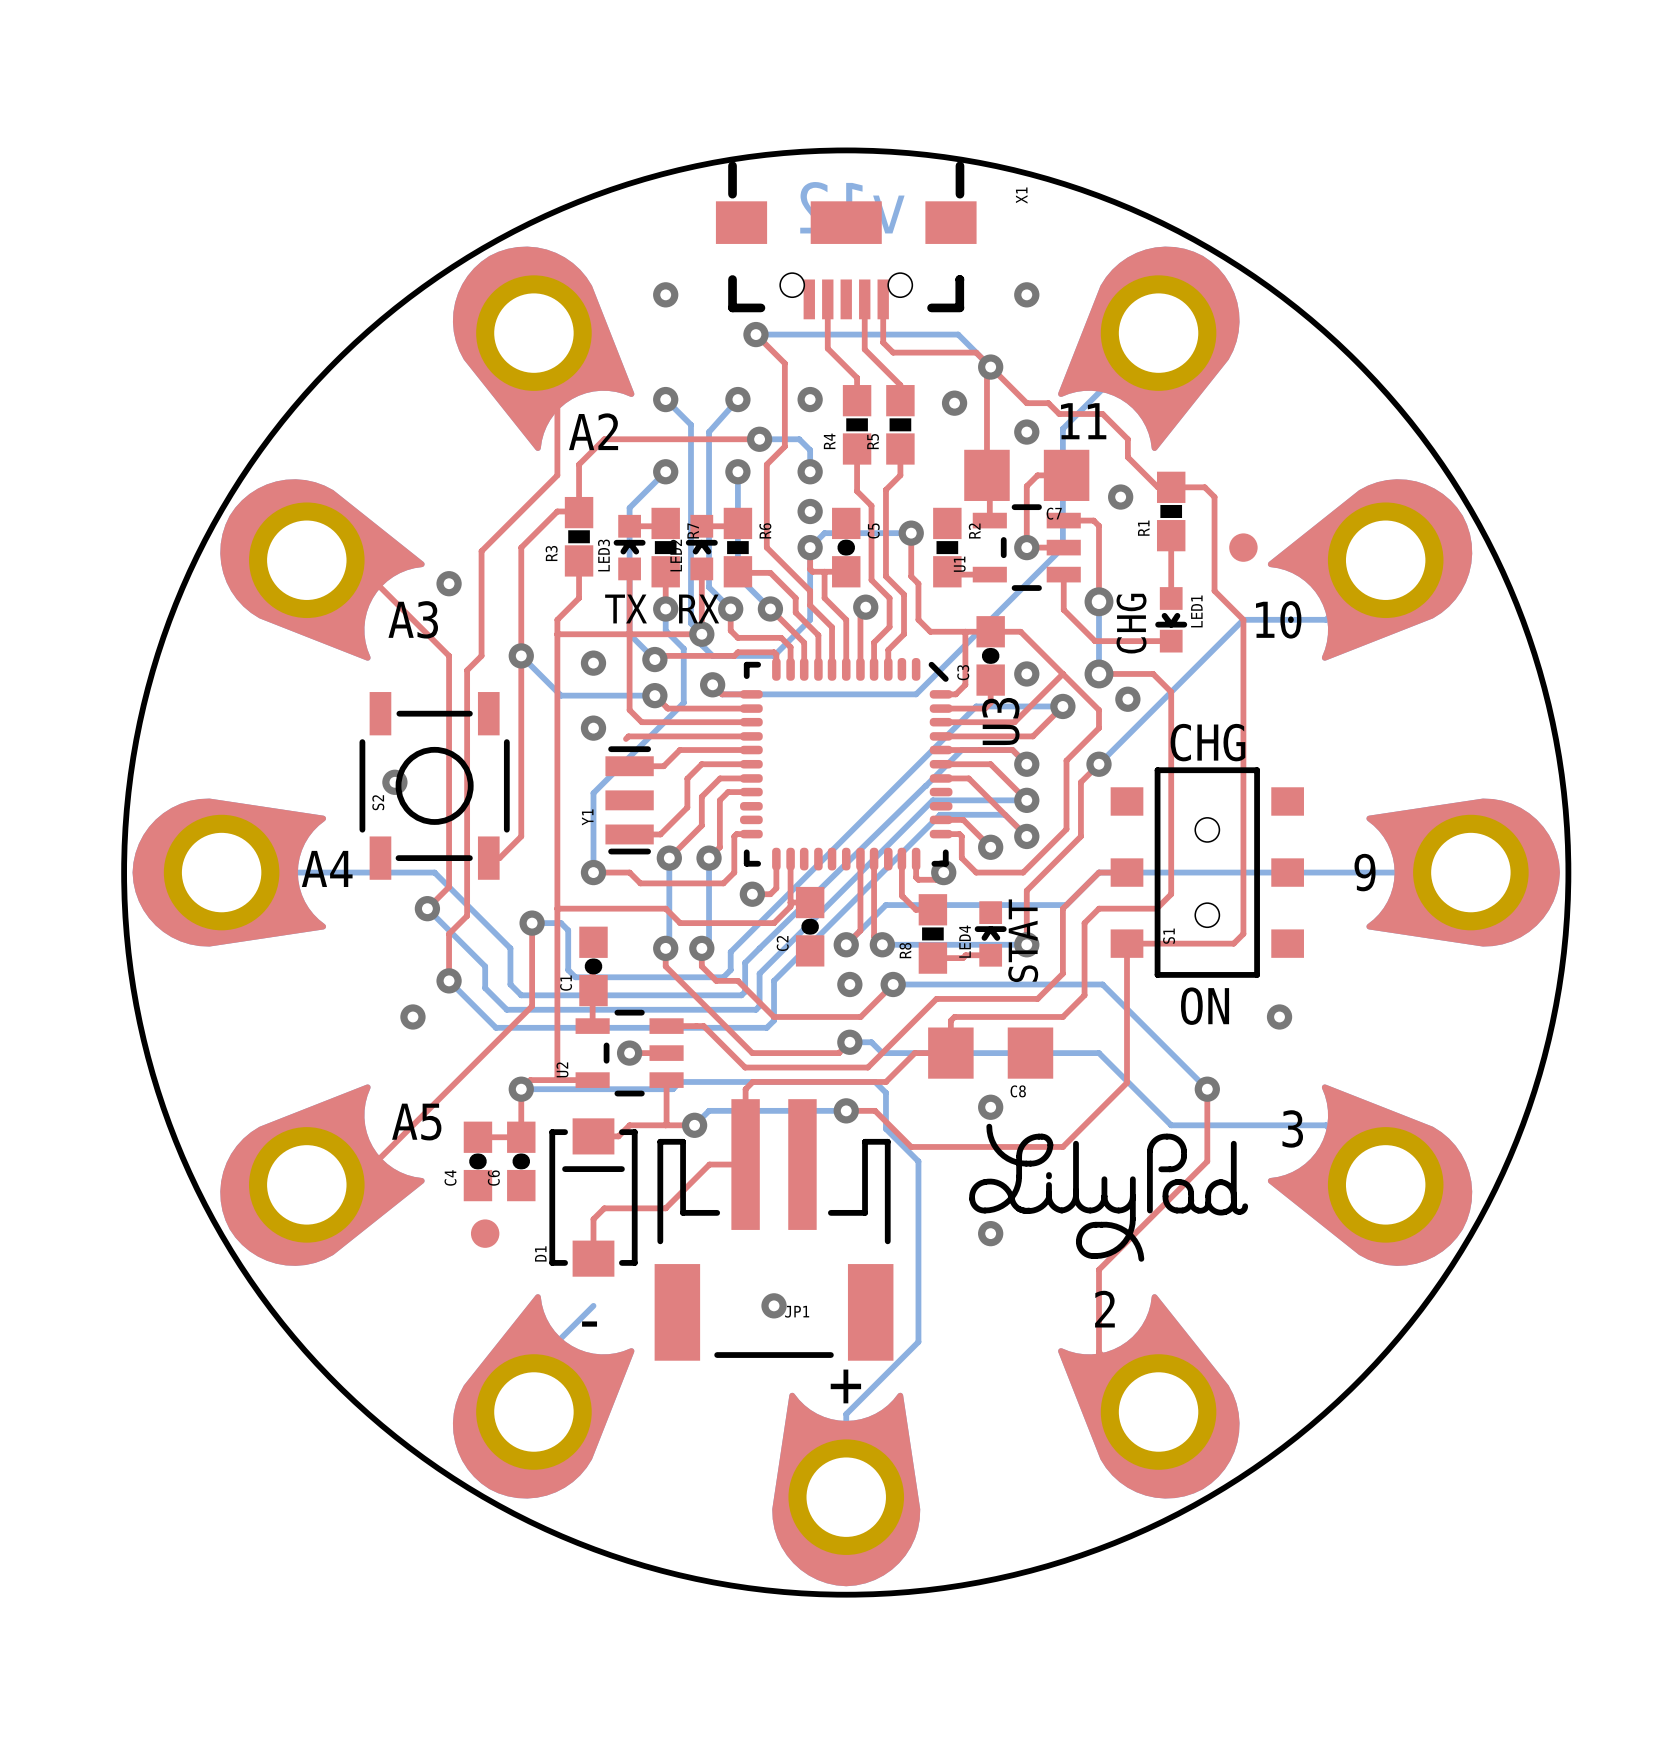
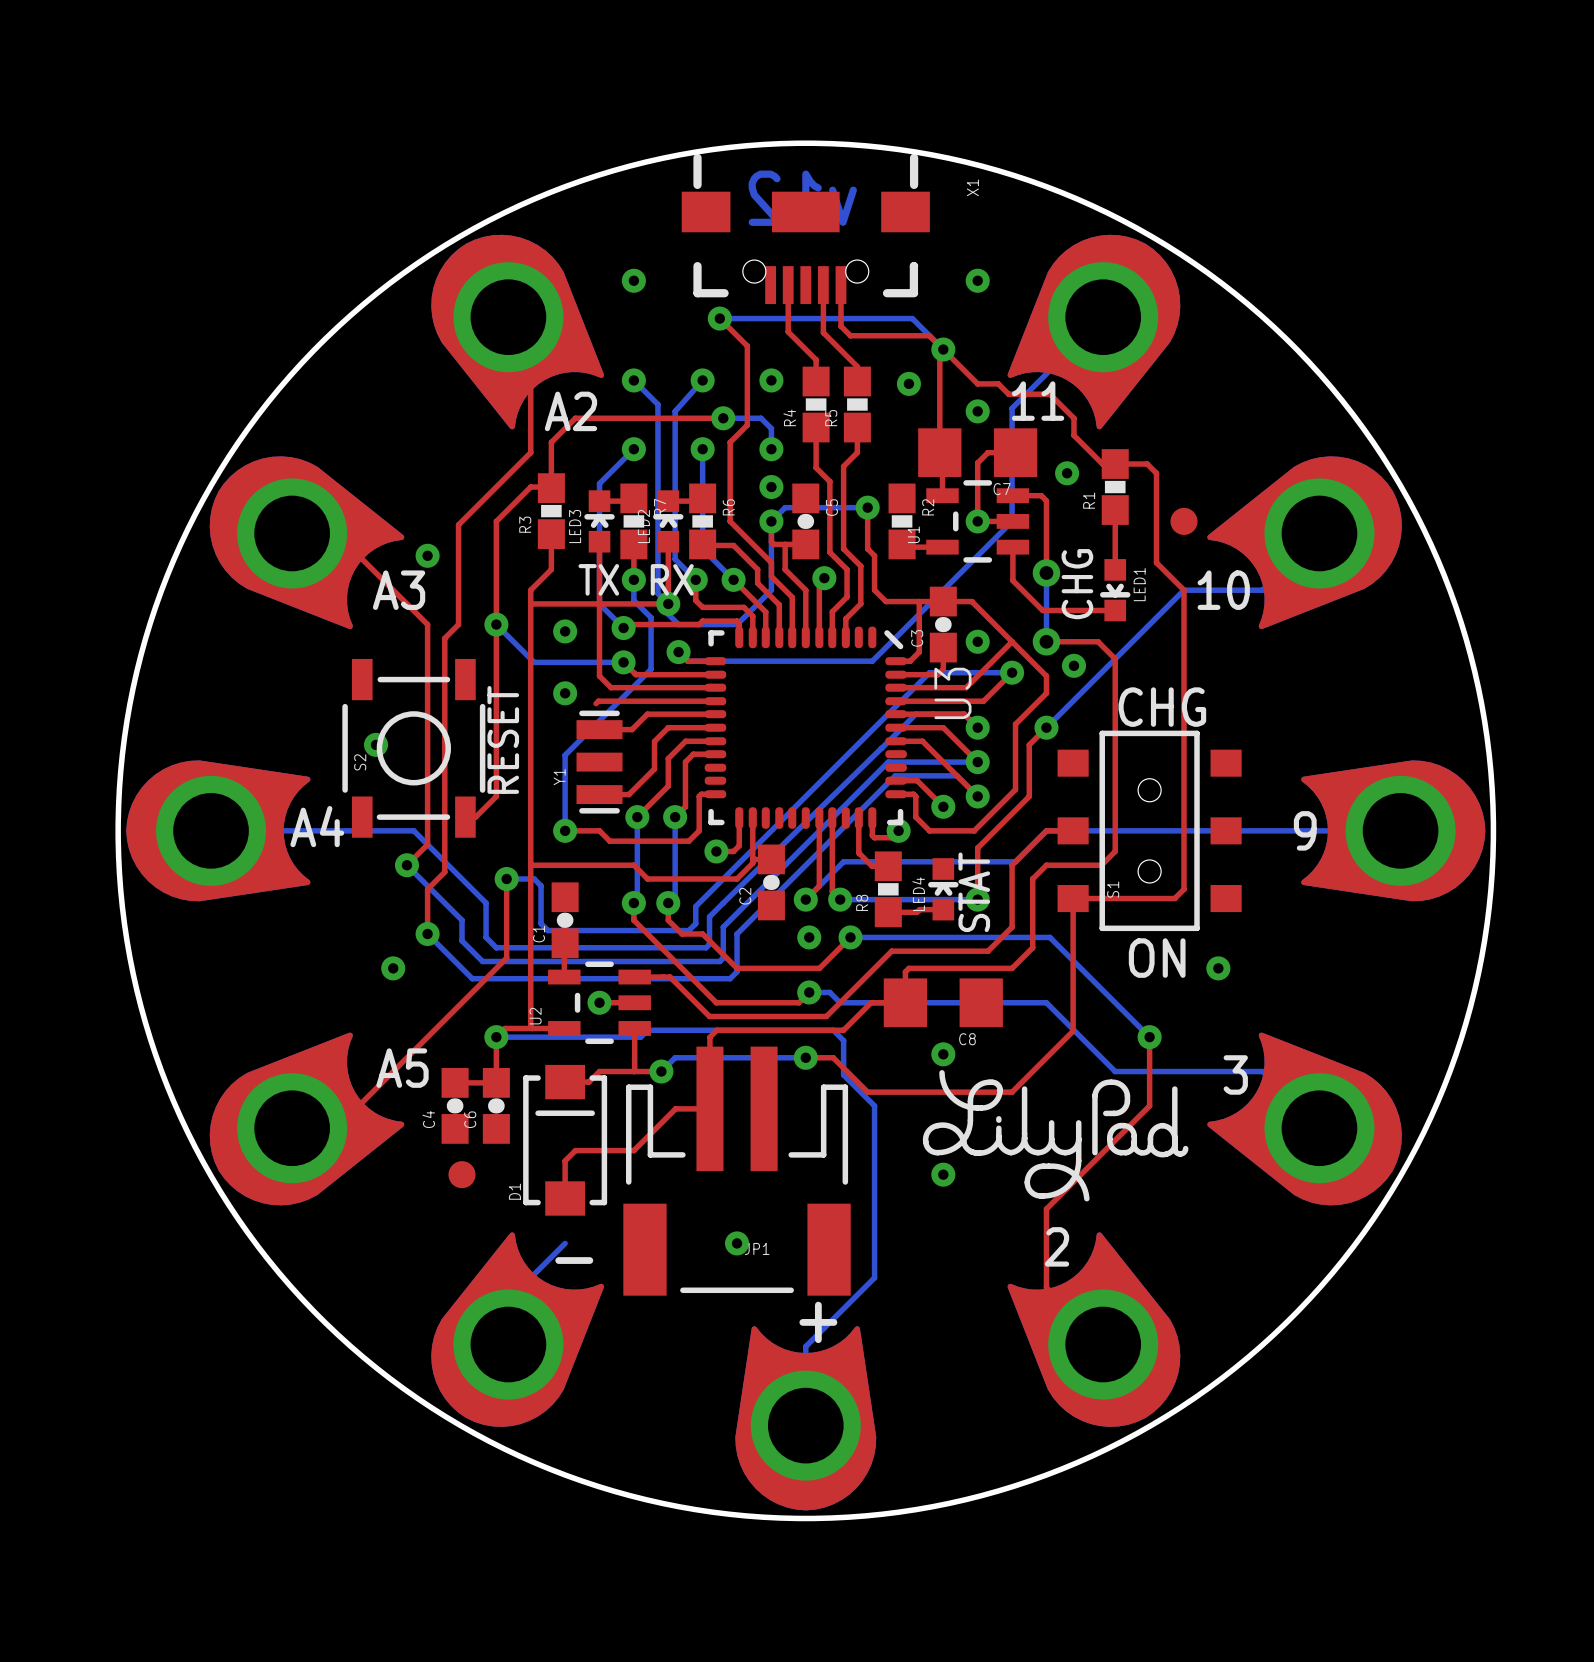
text: none -> RESET (503, 739)

